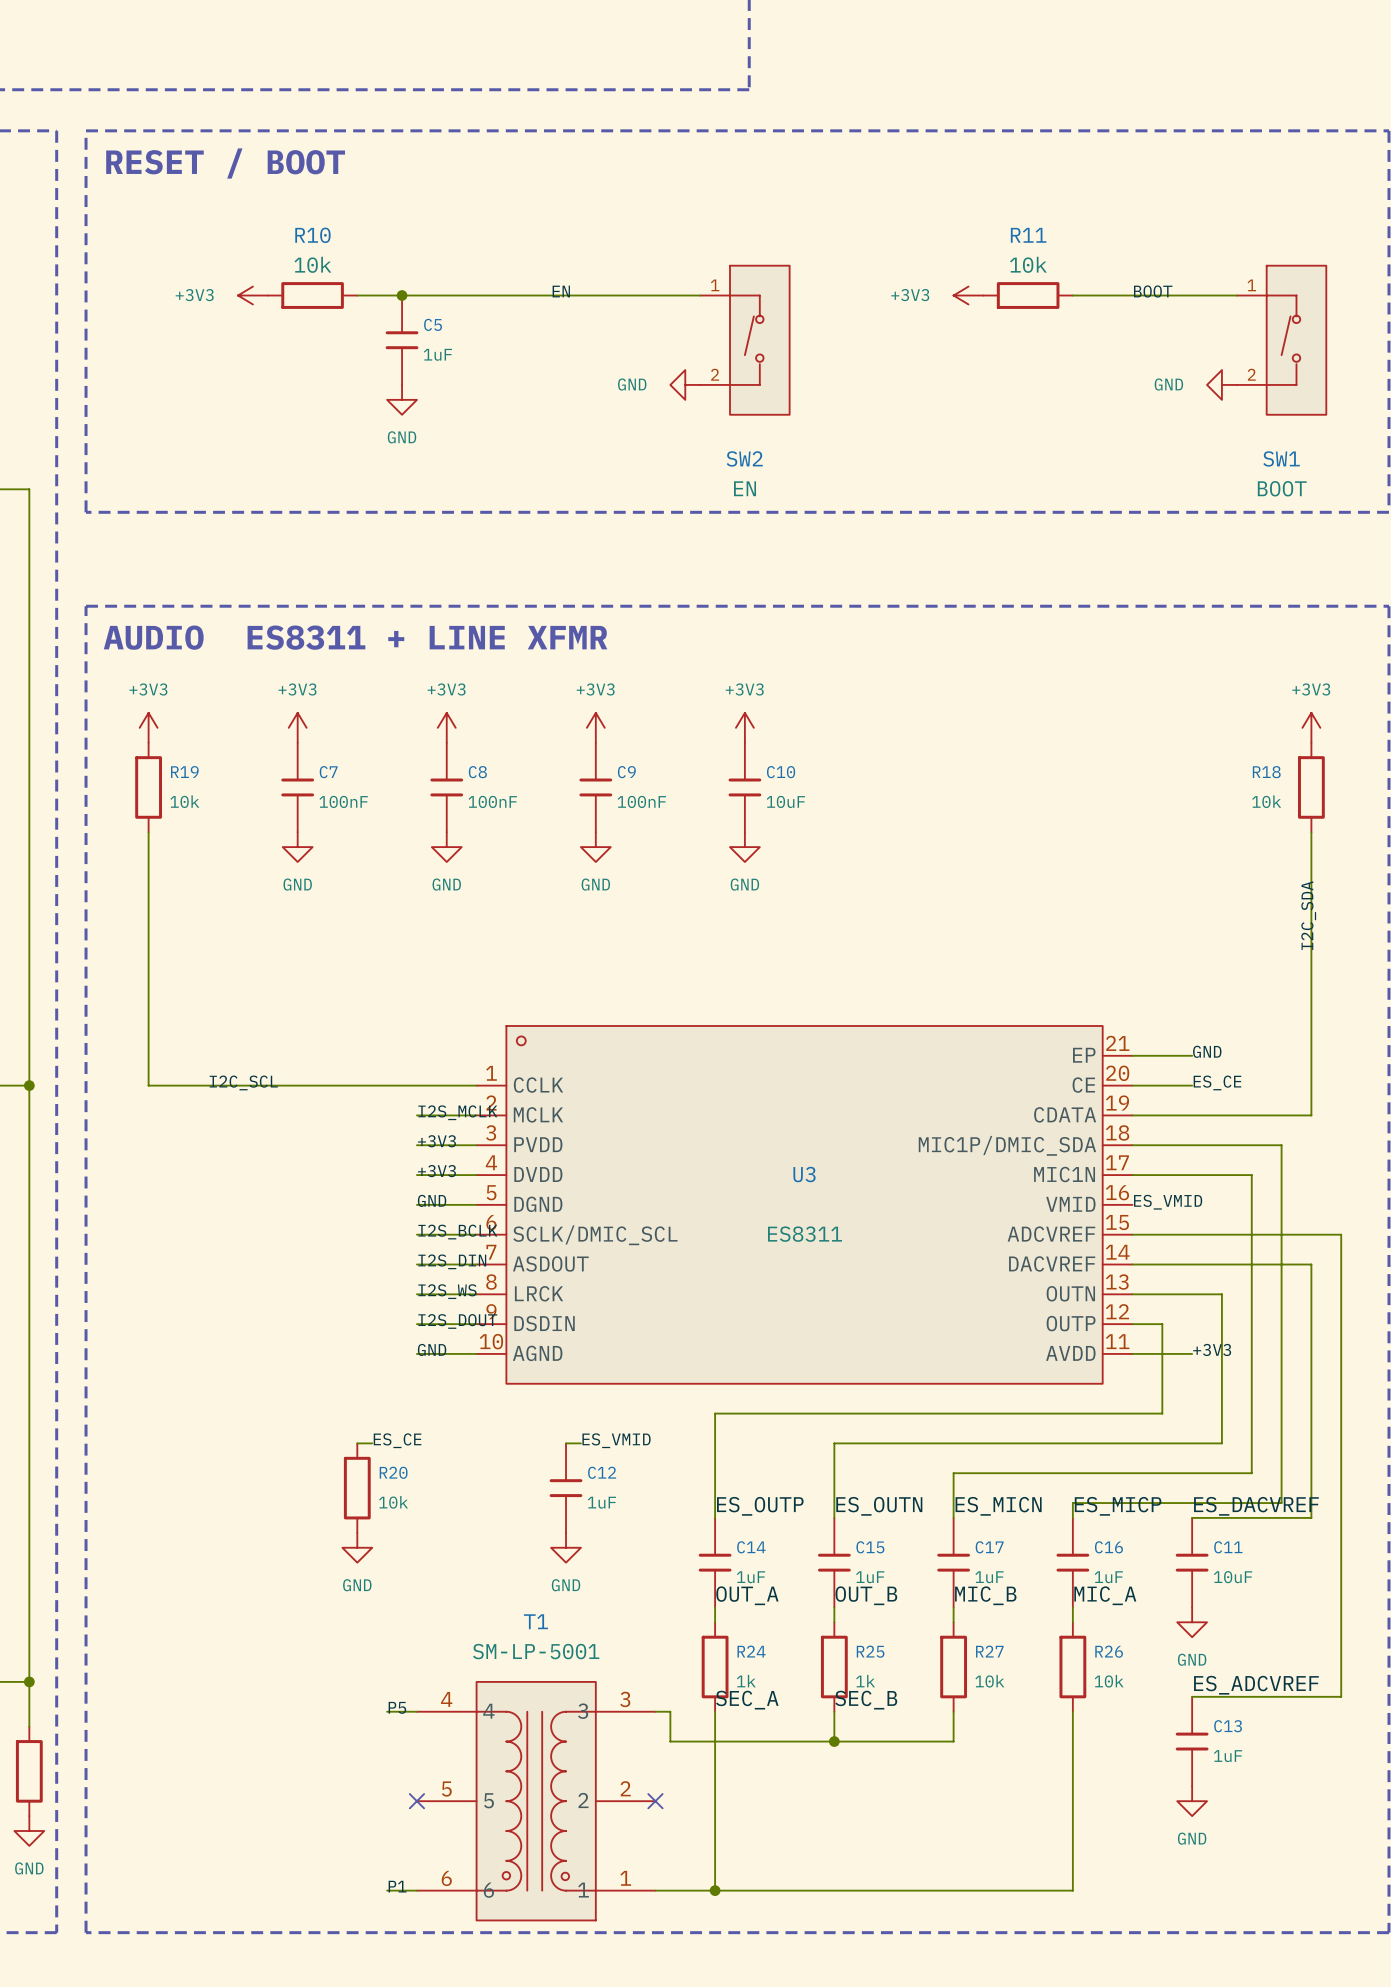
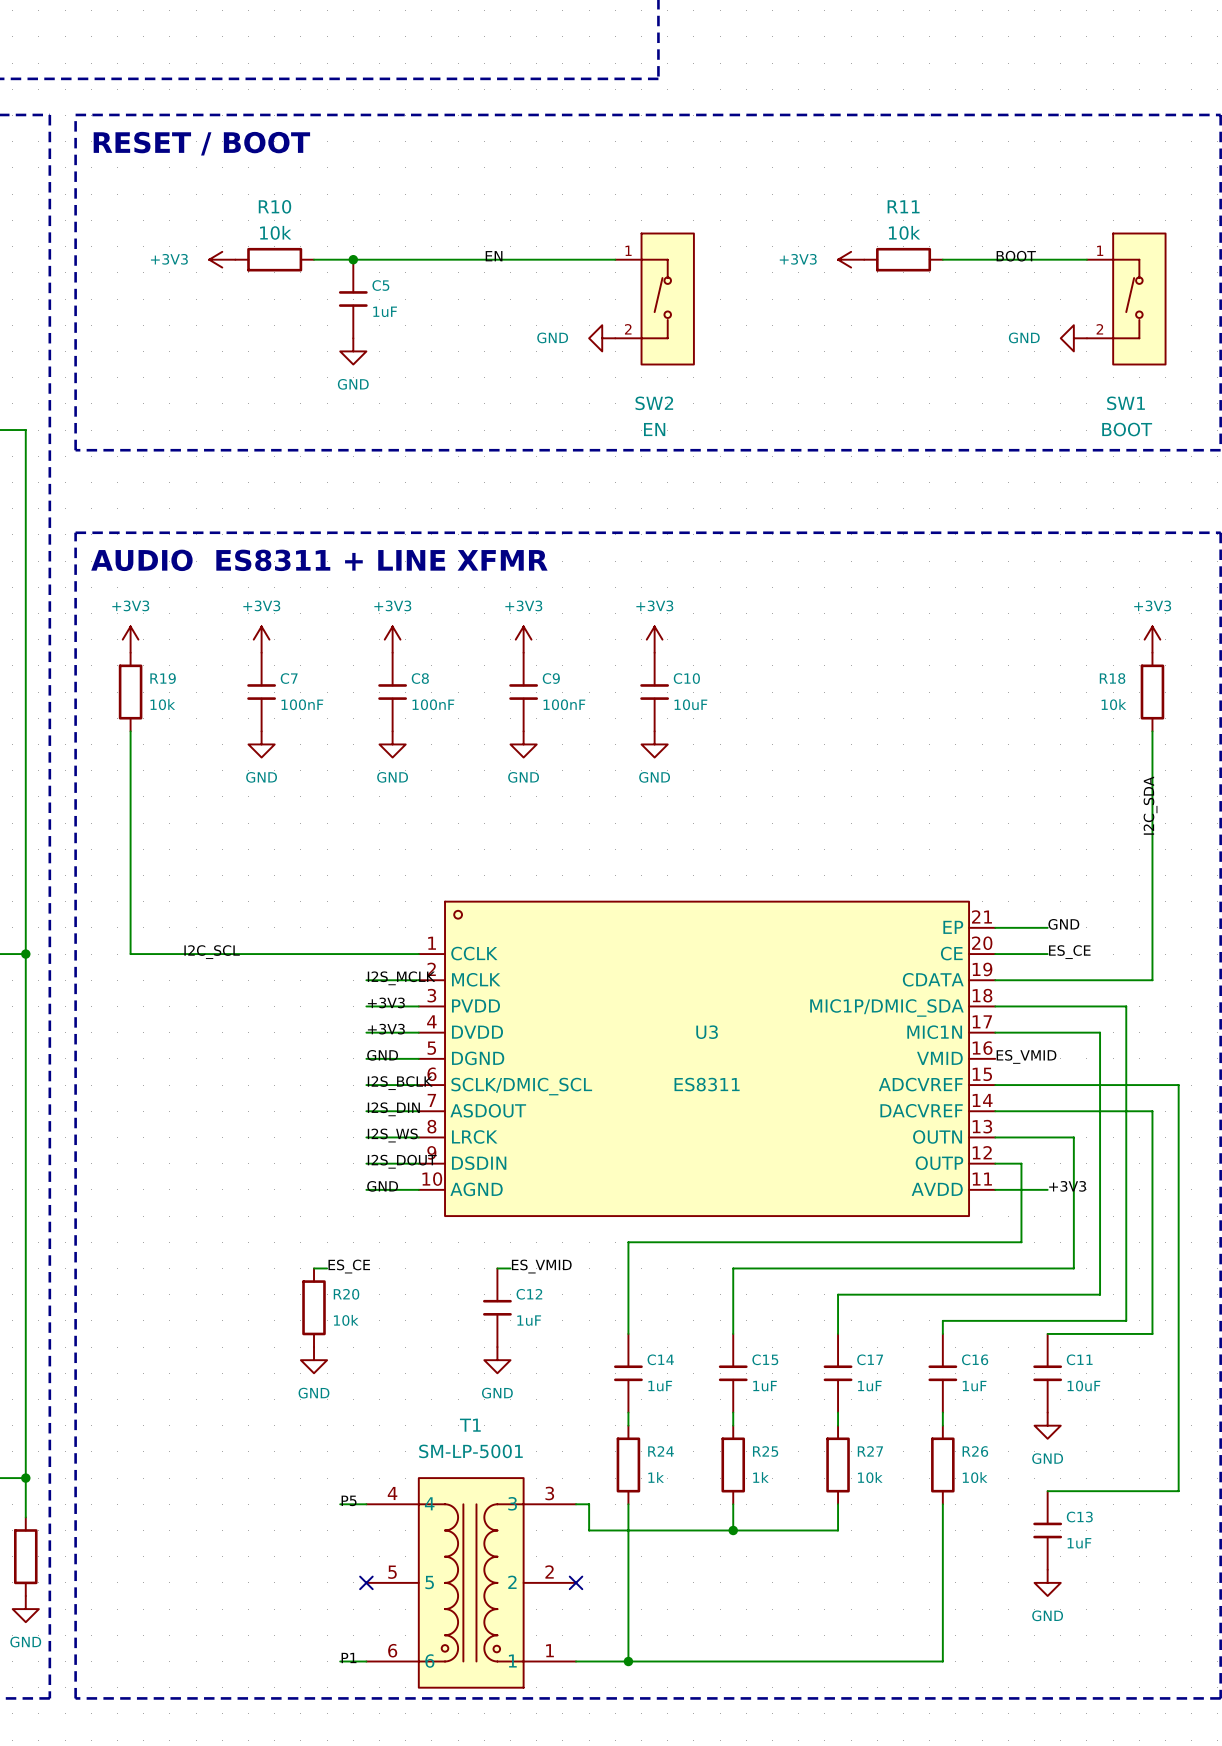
label: ES_OUTP (760, 1506) -> none
label: ES_OUTN (879, 1506) -> none
label: ES_MICN (998, 1506) -> none
label: ES_MICP (1118, 1506) -> none
label: ES_DACVREF (1256, 1506) -> none
label: OUT_A (747, 1595) -> none
label: OUT_B (866, 1595) -> none
label: MIC_B (985, 1595) -> none
label: MIC_A (1105, 1595) -> none
label: ES_ADCVREF (1256, 1685) -> none
label: SEC_A (747, 1700) -> none
label: SEC_B (866, 1700) -> none

